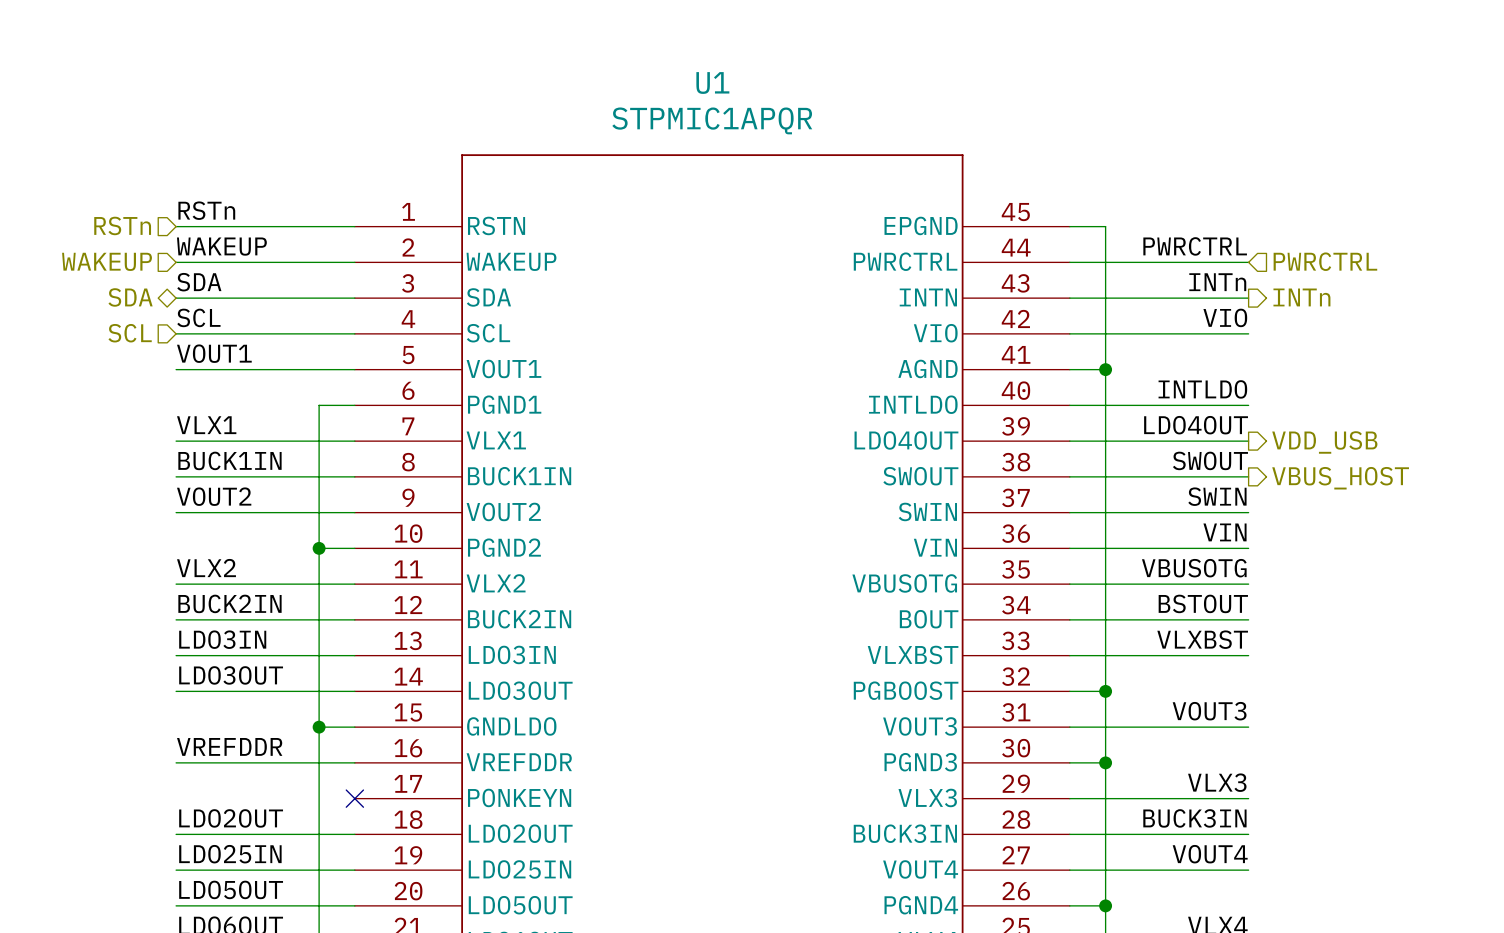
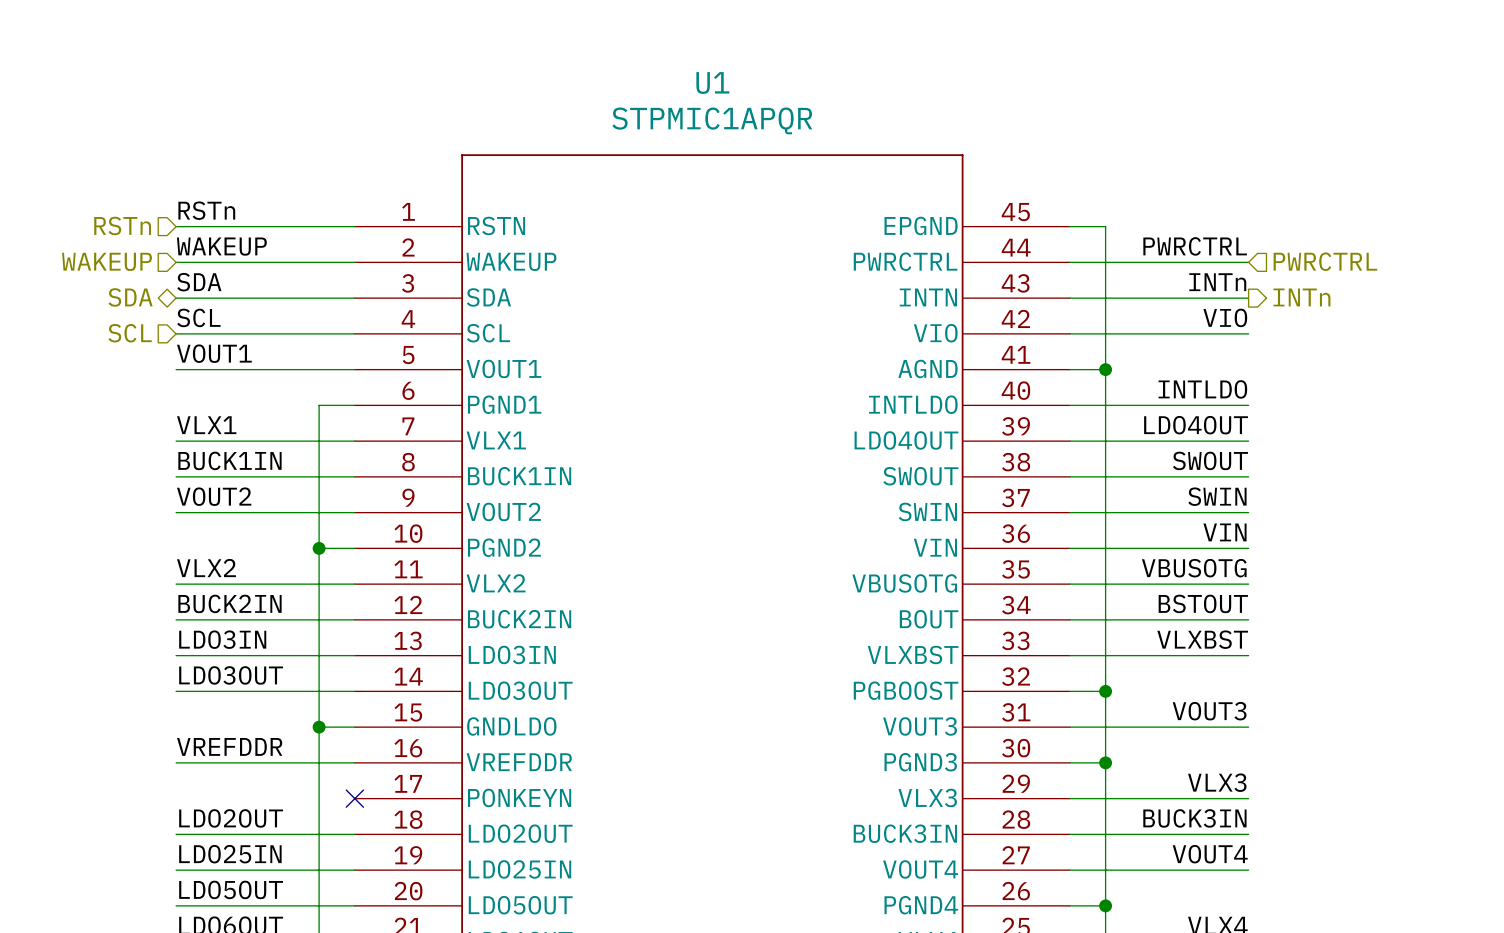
hierarchical label: VDD_USB (1324, 442) -> none
hierarchical label: VBUS_HOST (1340, 478) -> none

